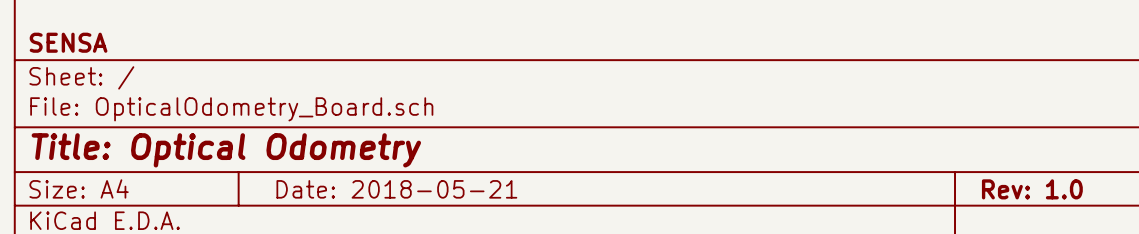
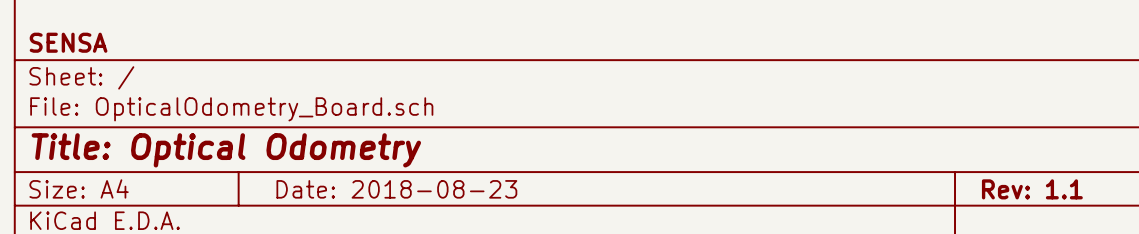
title block: Date: 2018-05-21 (396, 189) -> Date: 2018-08-23 (396, 189)
title block: Rev: 1.0 (1032, 189) -> Rev: 1.1 (1032, 189)

